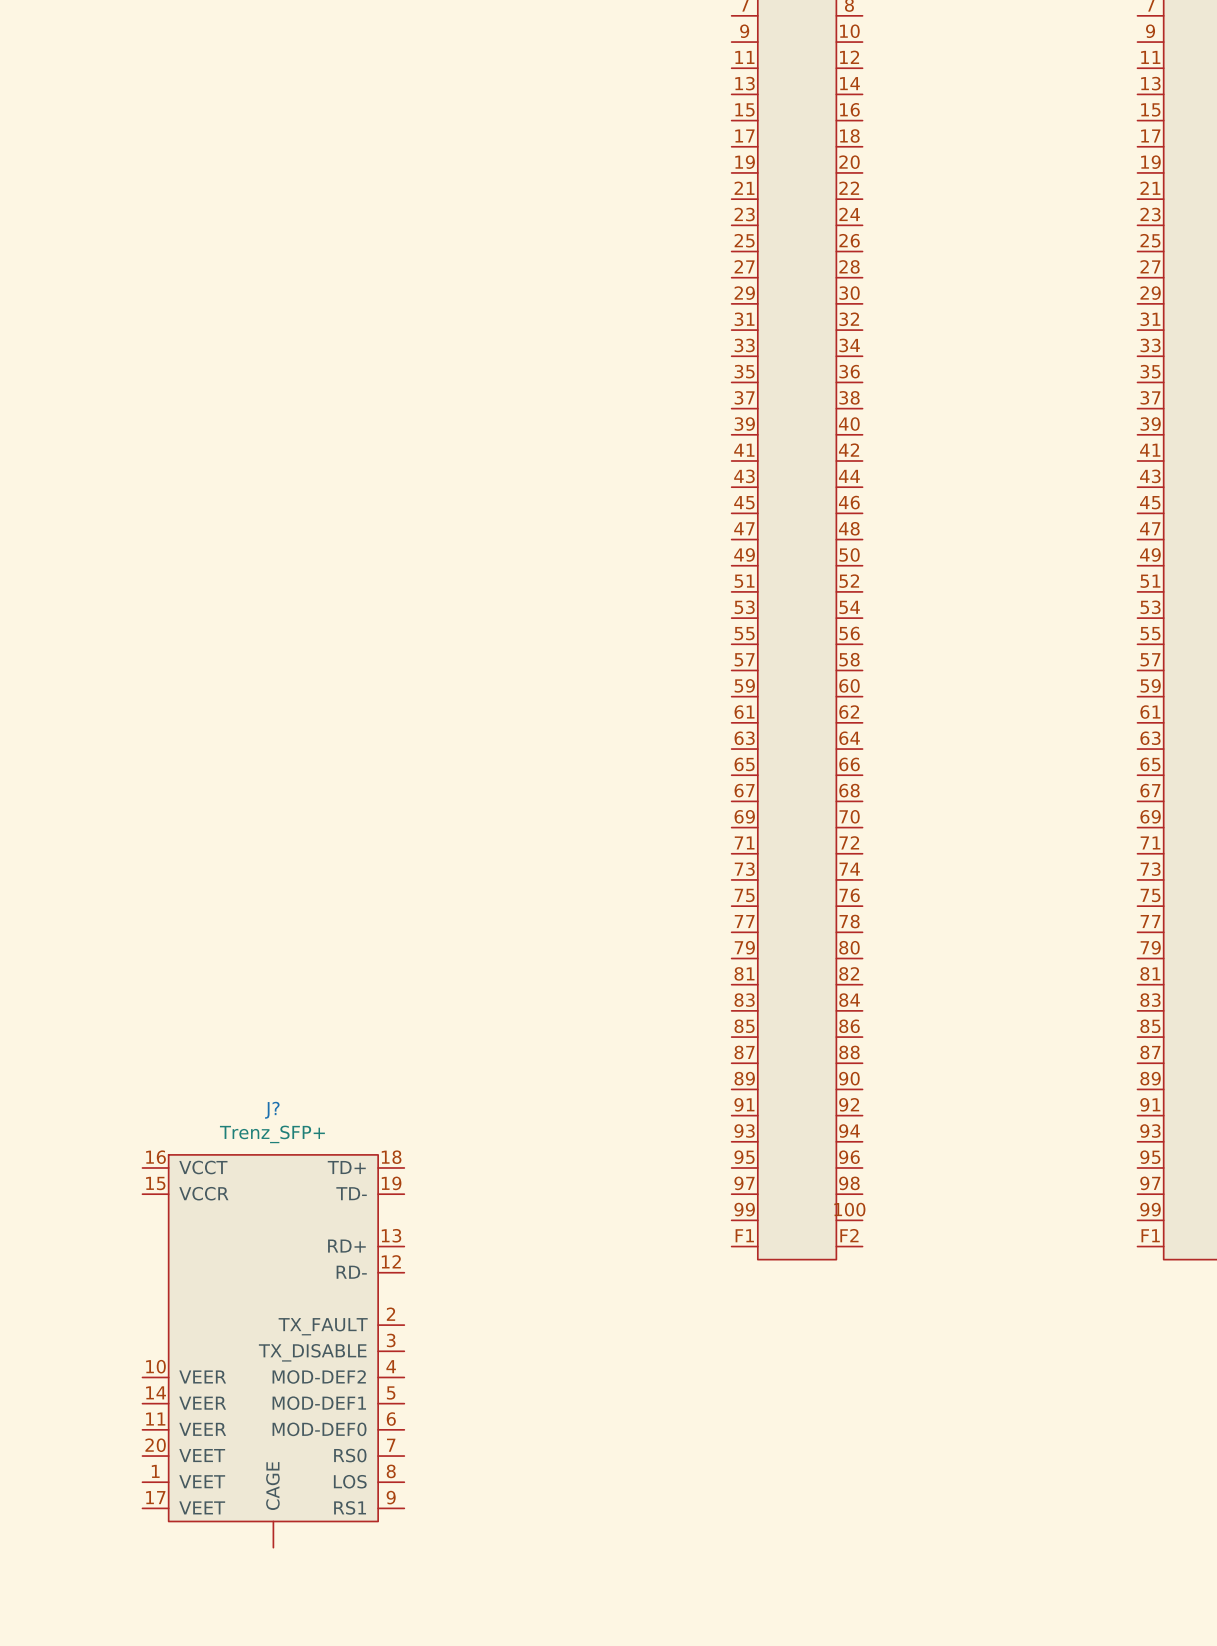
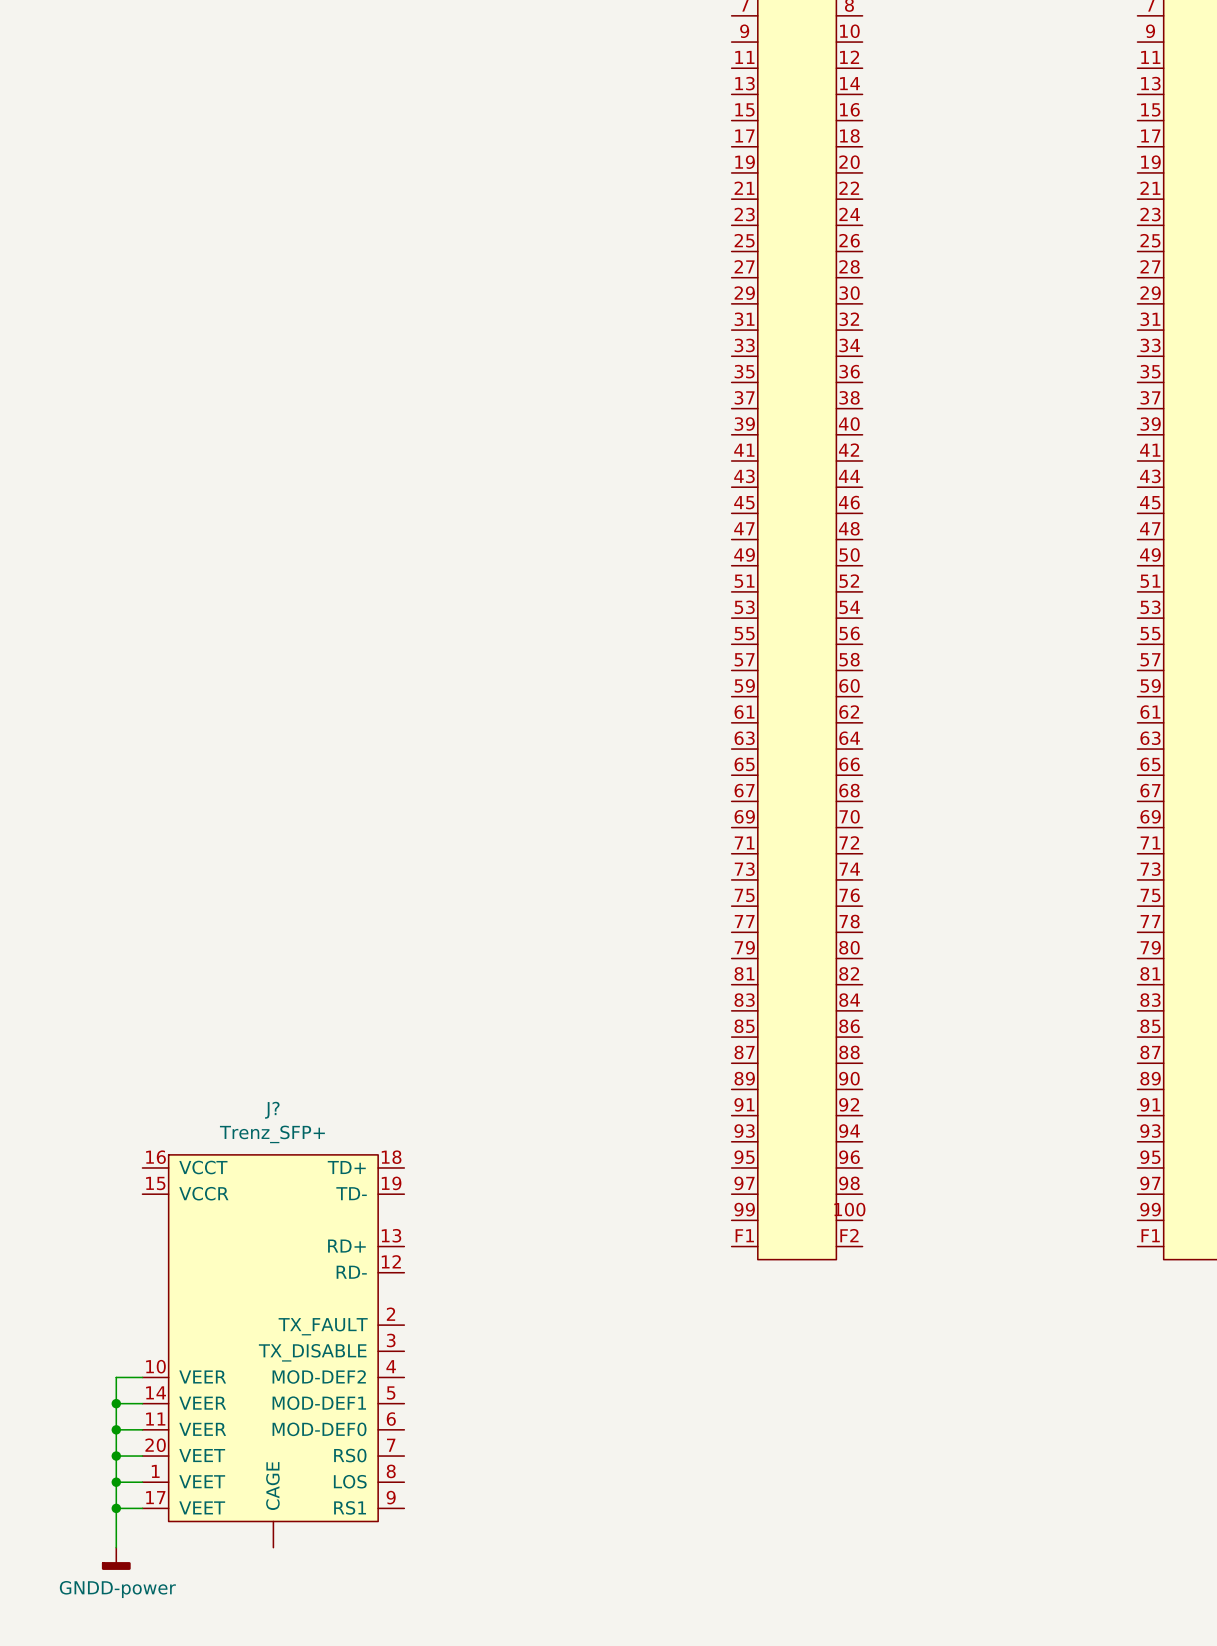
wire: none -> (142, 1377) (116, 1377) (116, 1547)
wire: none -> (116, 1403) (142, 1403)
junction: none -> (116, 1403)
wire: none -> (116, 1429) (142, 1429)
junction: none -> (116, 1429)
wire: none -> (116, 1456) (142, 1456)
junction: none -> (116, 1456)
wire: none -> (116, 1482) (142, 1482)
junction: none -> (116, 1482)
wire: none -> (116, 1508) (142, 1508)
junction: none -> (116, 1508)
power symbol: none -> GNDD-power (116, 1558)

